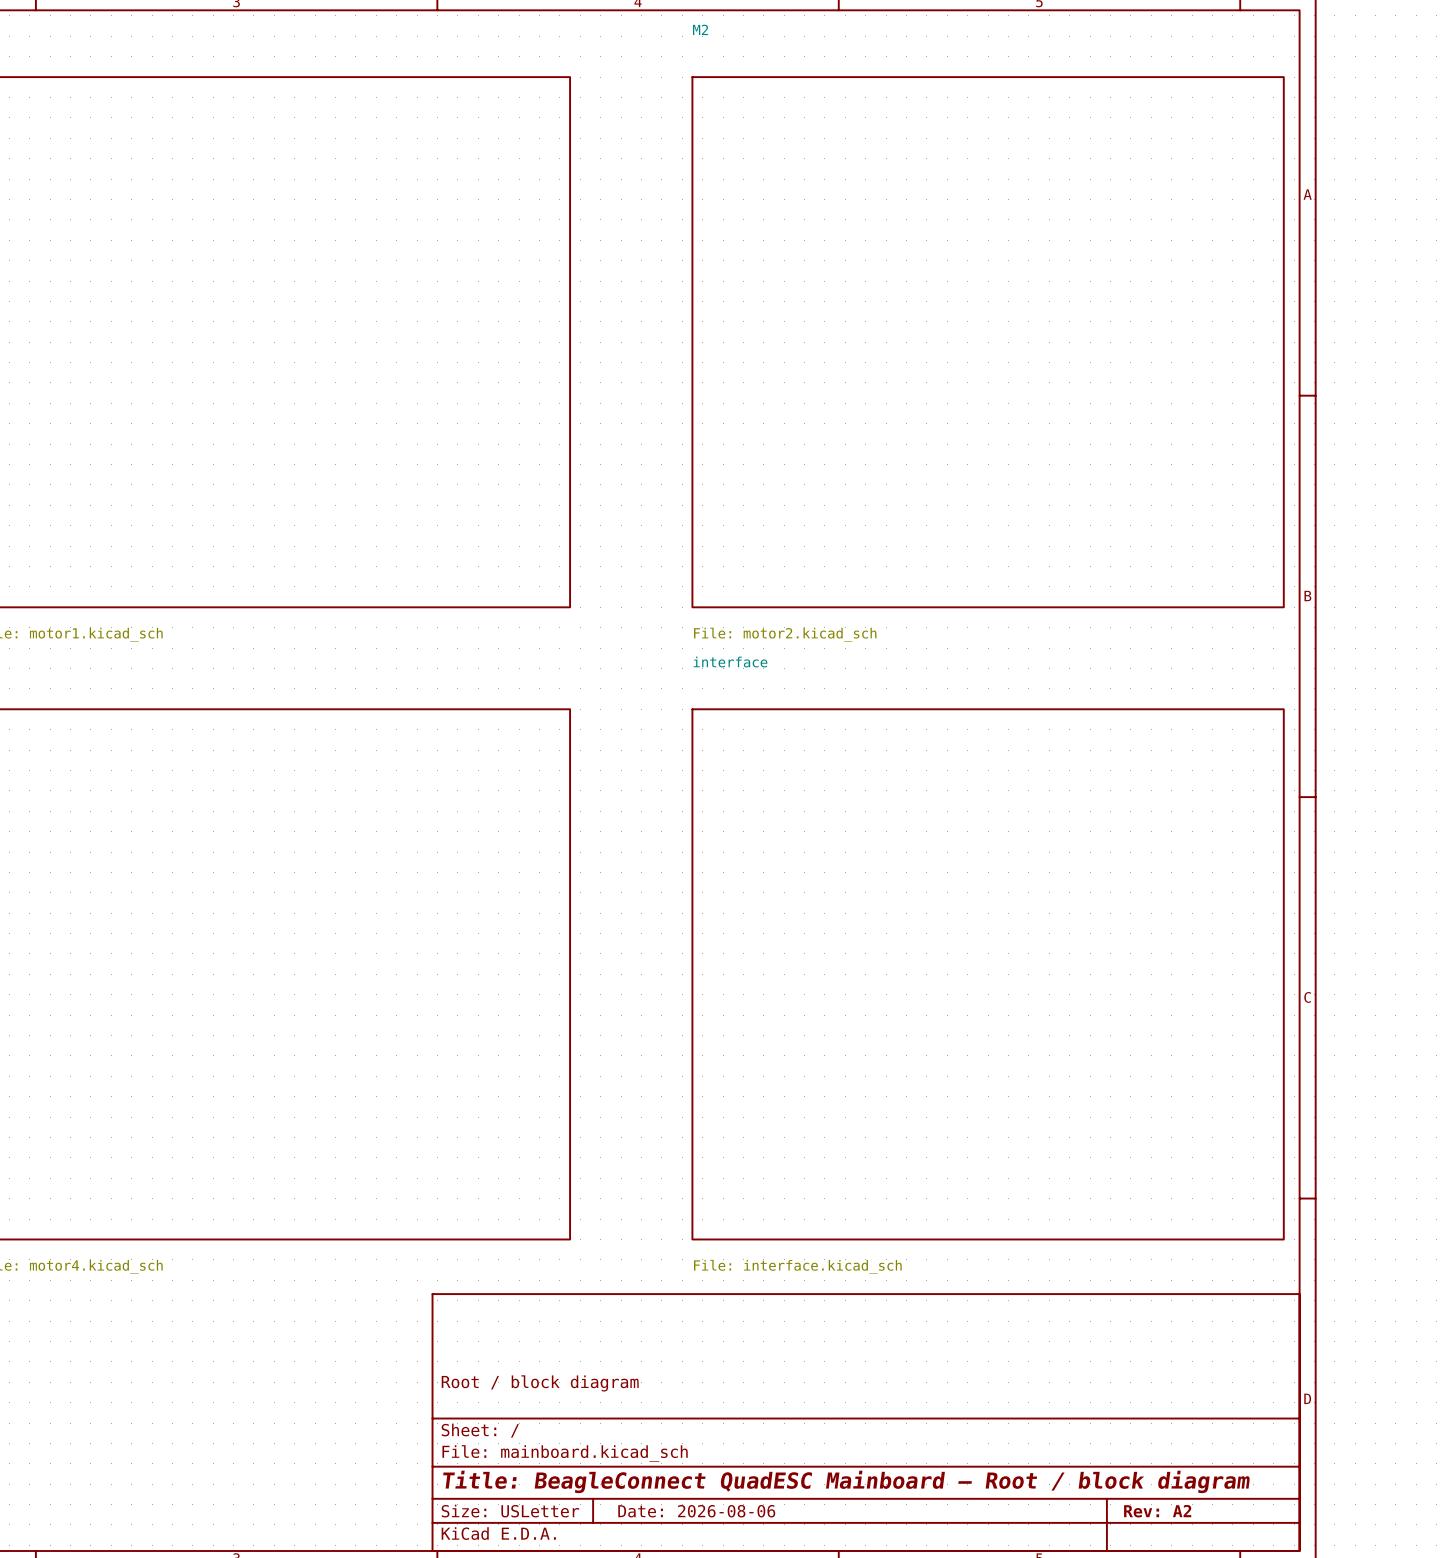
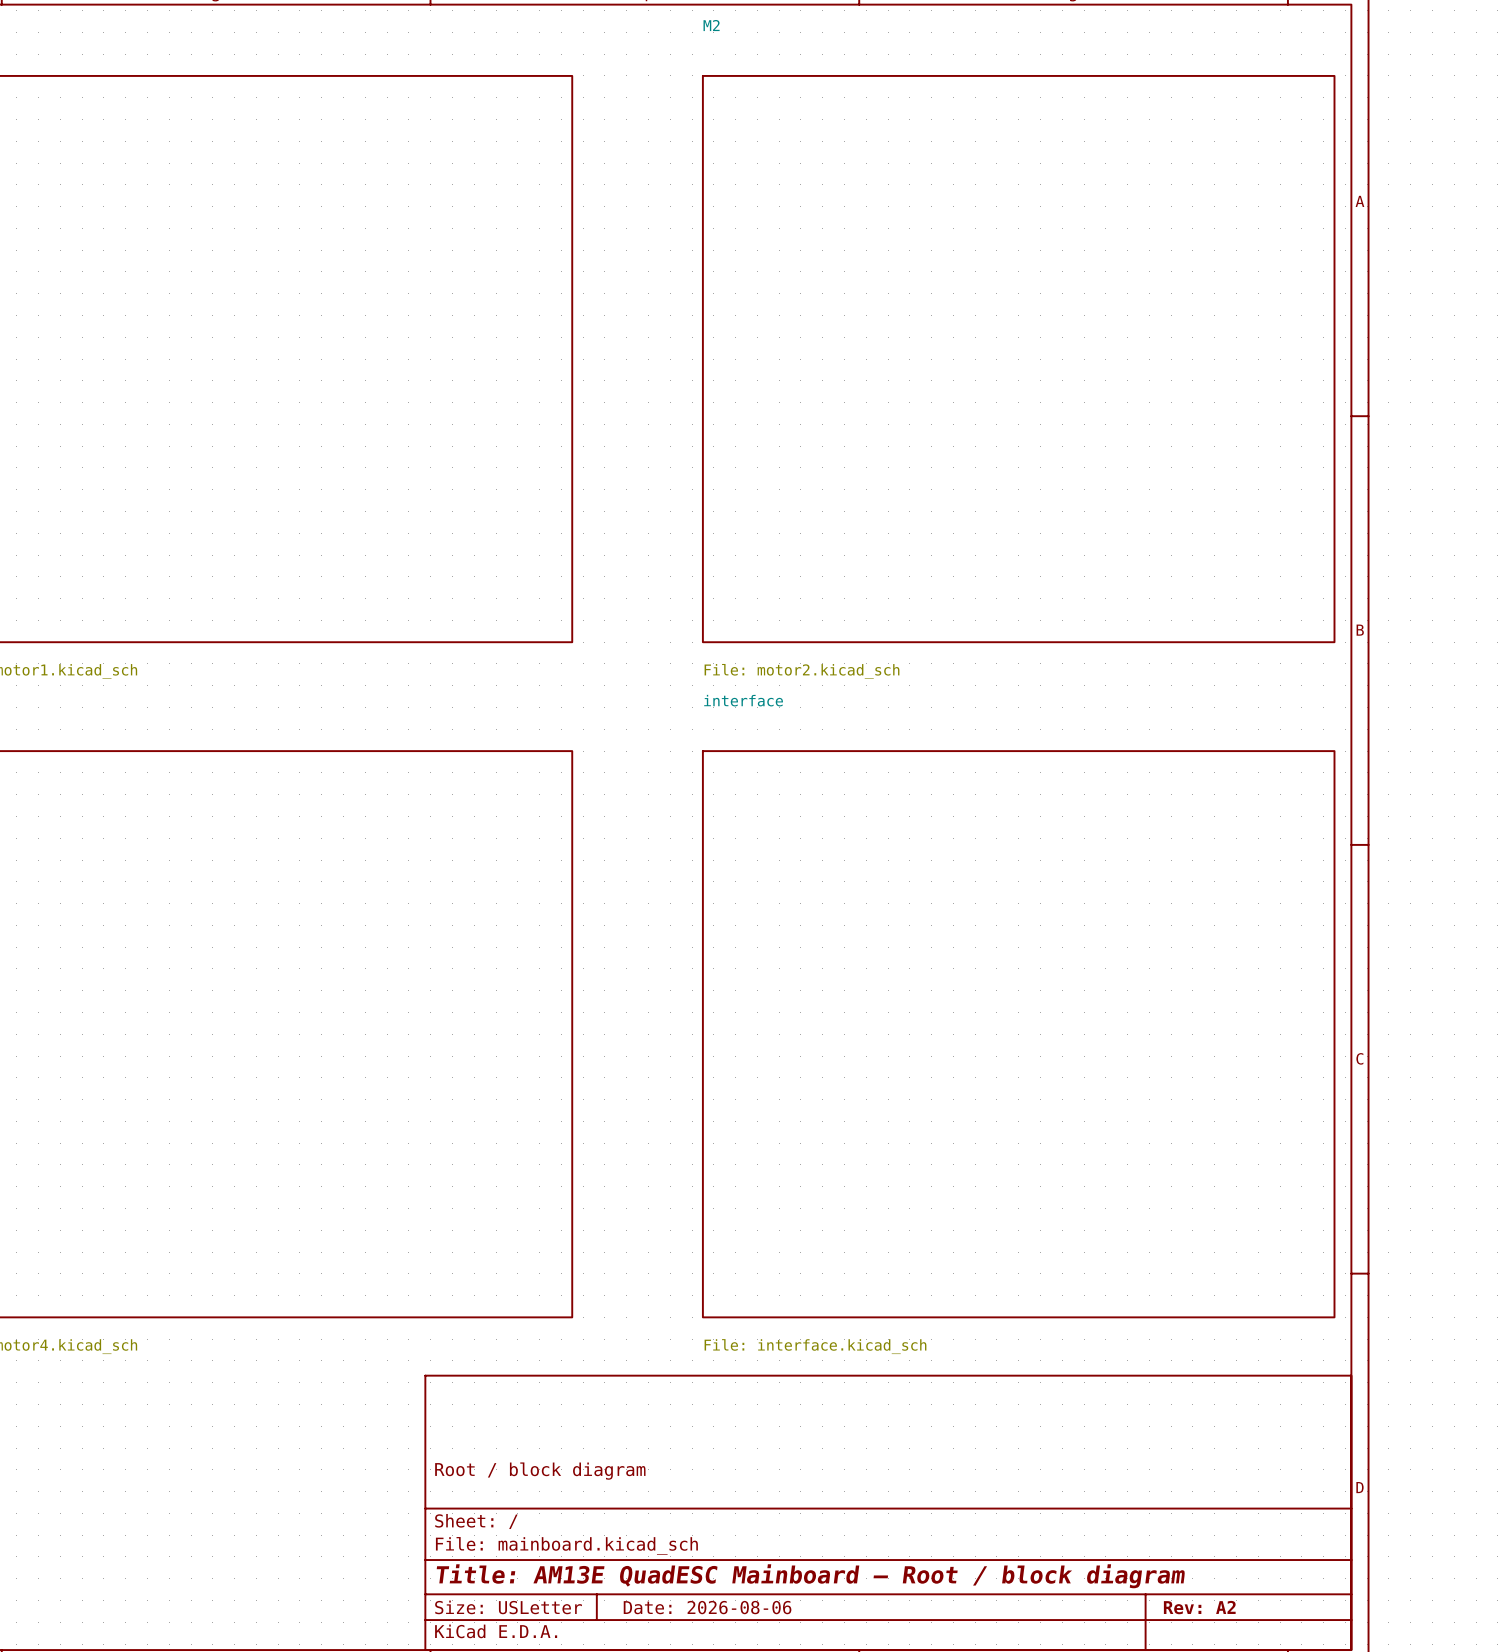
title block: Title: BeagleConnect QuadESC Mainboard — Root / block diagram (846, 1481) -> Title: AM13E QuadESC Mainboard — Root / block diagram (810, 1576)

